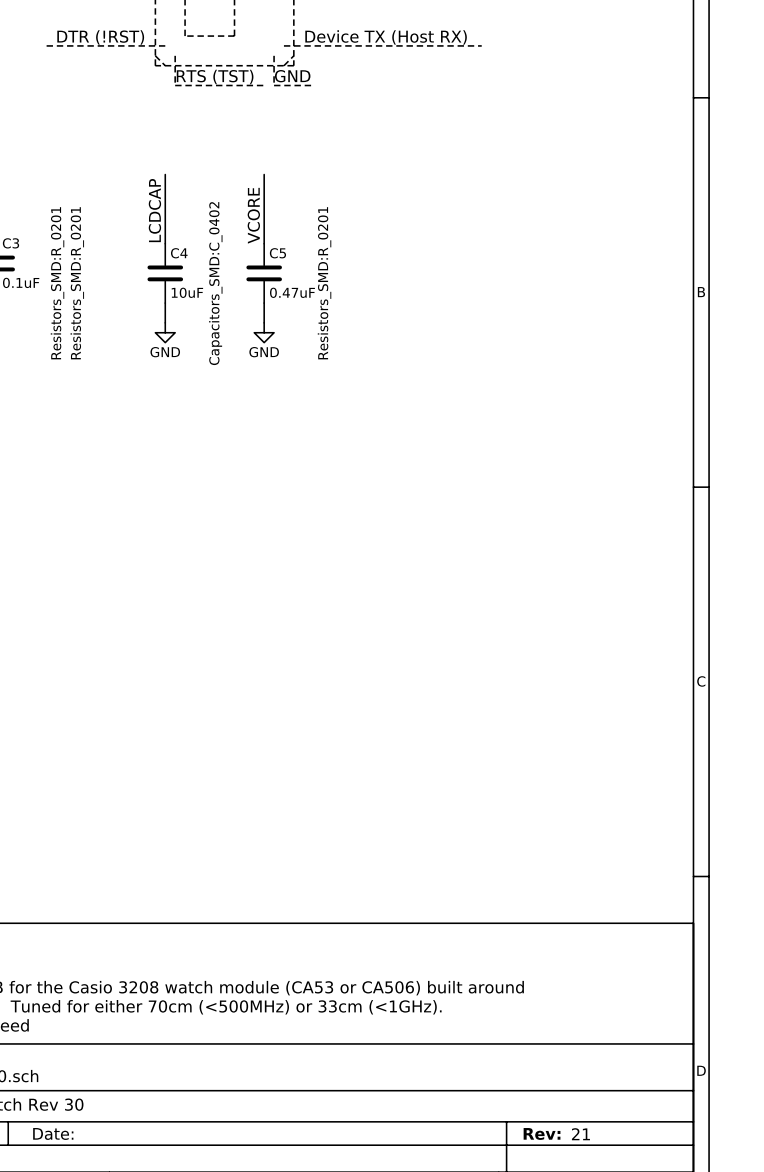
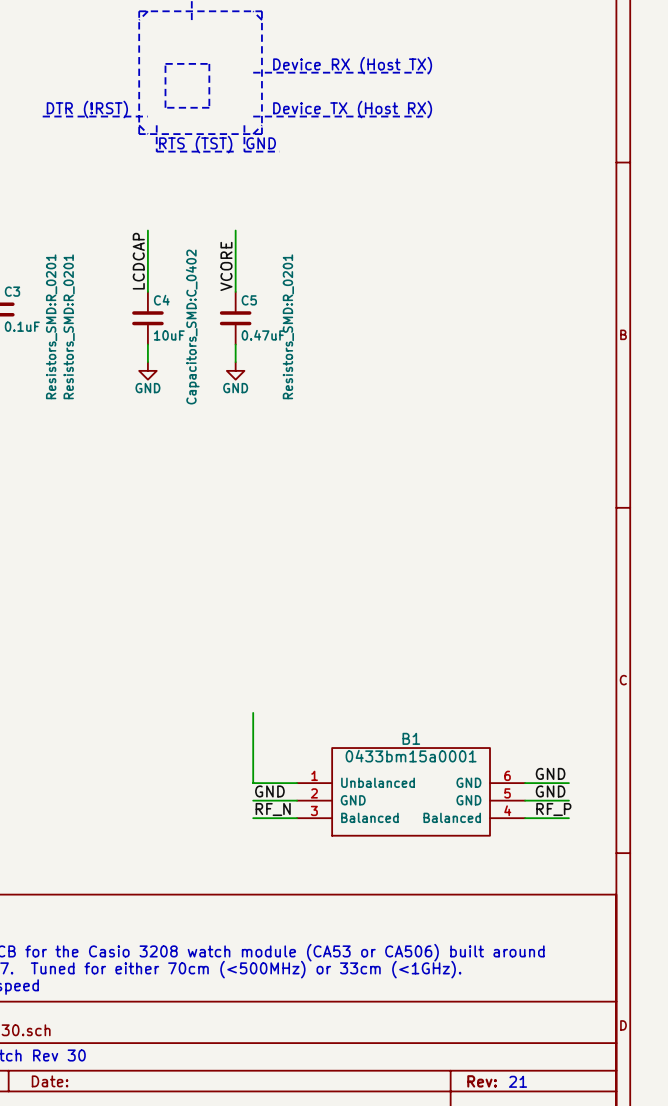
wire: none -> (253, 712) (253, 783) (297, 783)
label: none -> GND (550, 773)
wire: none -> (525, 783) (568, 783)
label: none -> GND (269, 791)
label: none -> GND (550, 791)
B1: none -> 0433bm15a0001 (411, 791)
wire: none -> (253, 800) (297, 800)
wire: none -> (525, 800) (568, 800)
label: none -> RF_N (273, 809)
label: none -> RF_P (553, 809)
wire: none -> (253, 818) (297, 818)
wire: none -> (525, 818) (568, 818)

